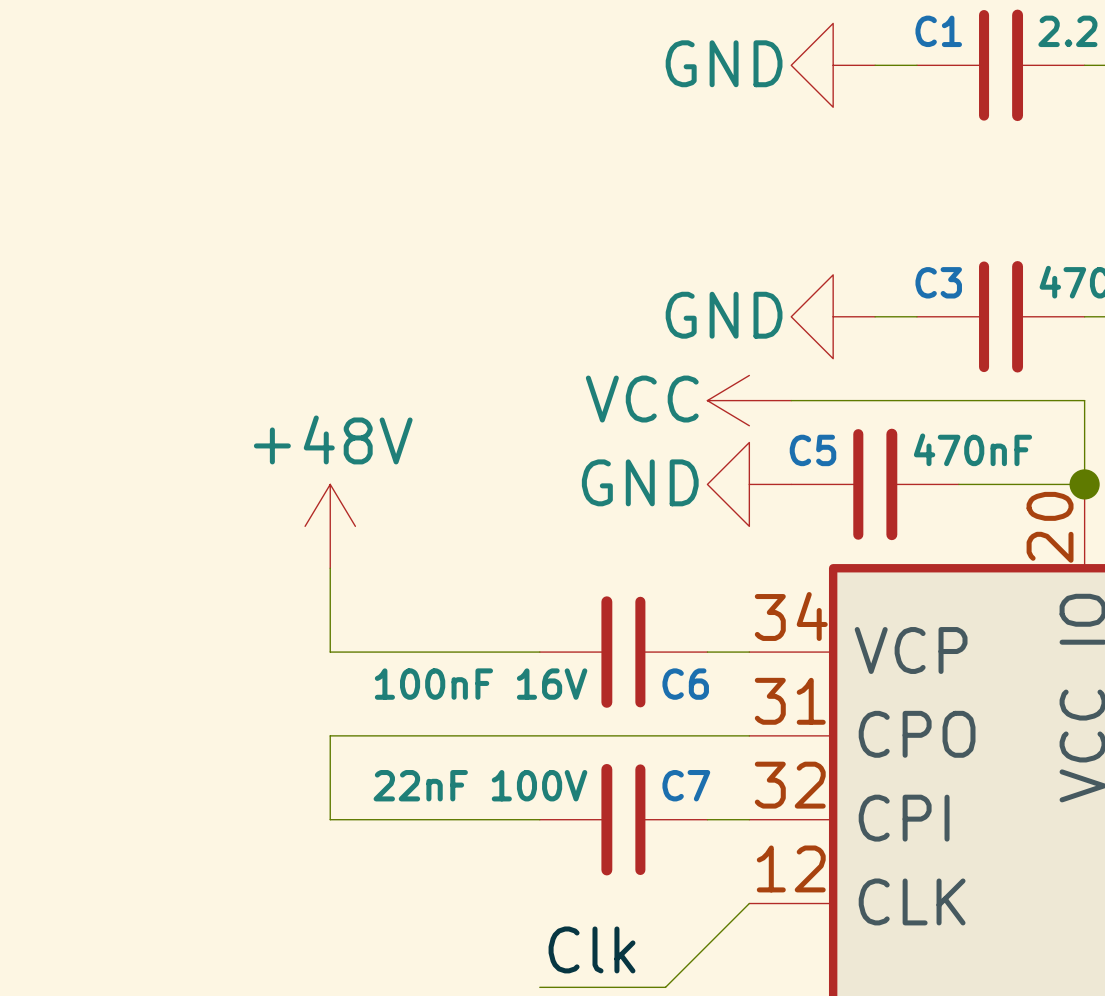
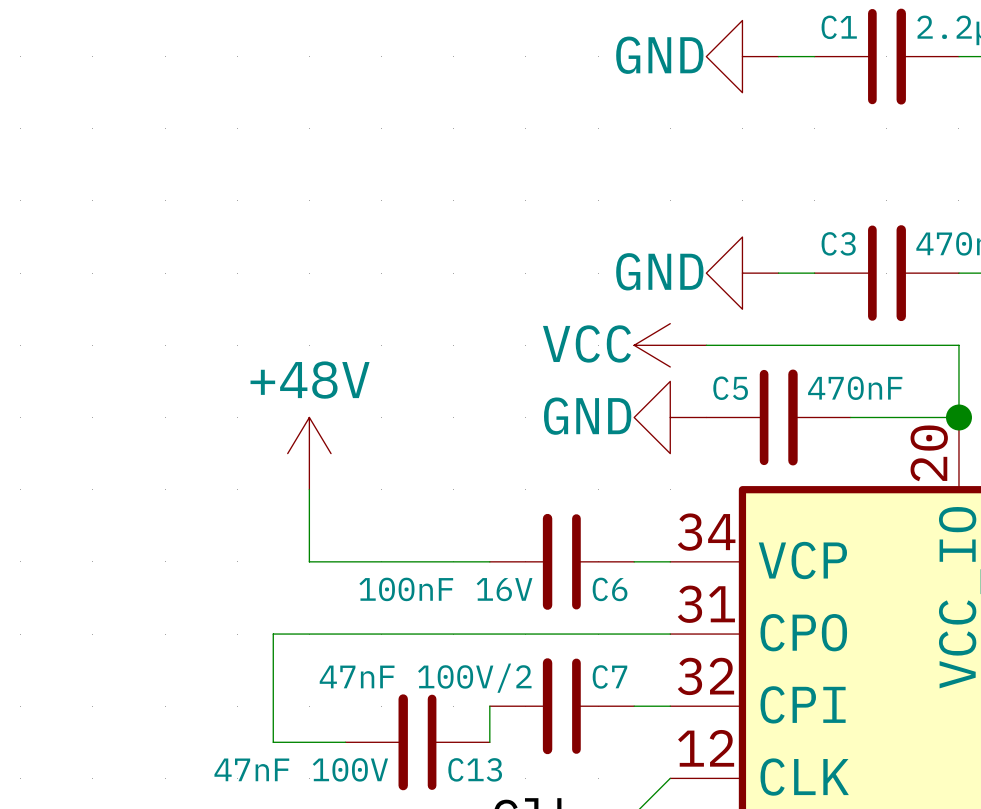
wire: (330, 735) (330, 819) (539, 819) -> (309, 634) (273, 634) (273, 742) (345, 742)
C7 value: 22nF 100V (480, 785) -> 47nF 100V/2 (425, 678)
wire: none -> (489, 706) (489, 742)
C13: none -> 47nF 100V (417, 742)

